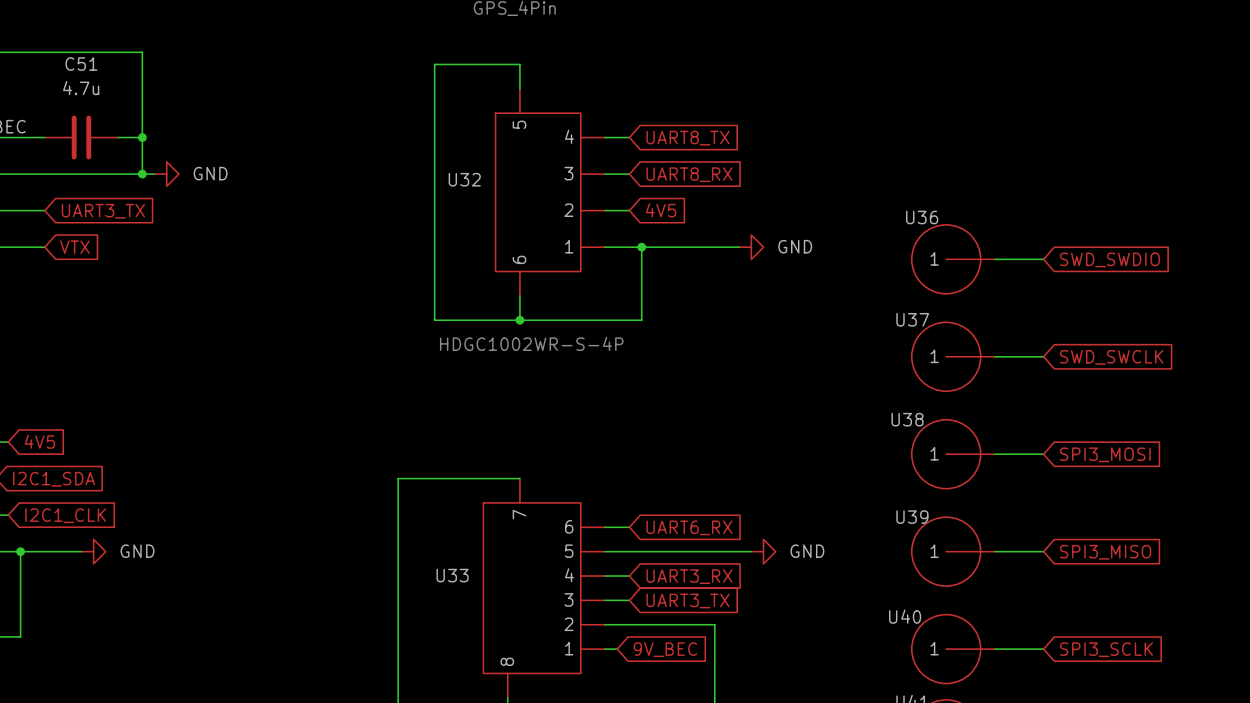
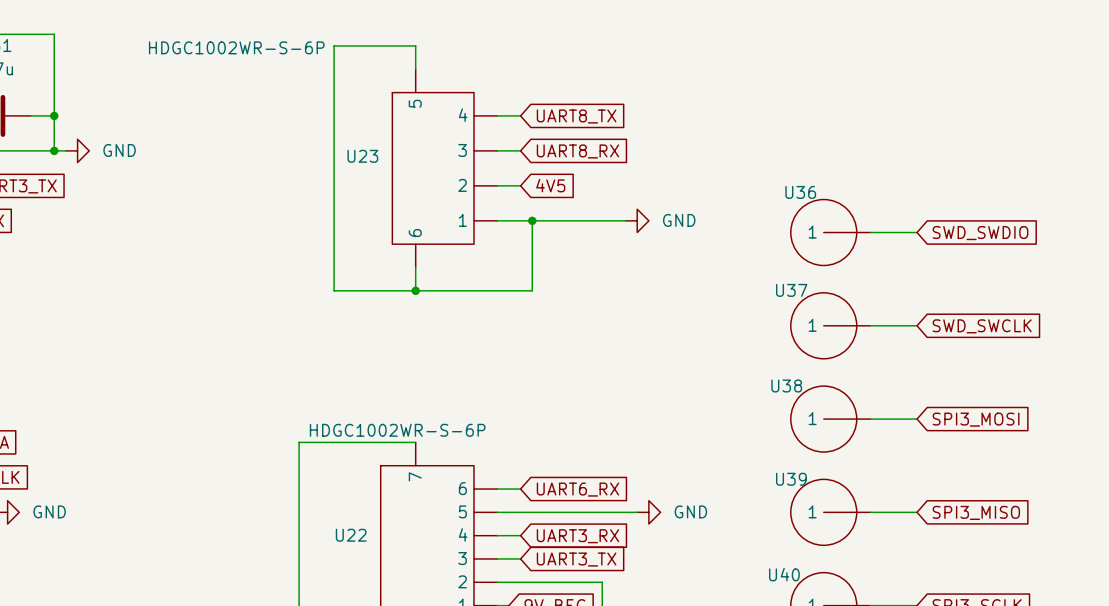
U32 value: none -> HDGC1002WR-S-6P (236, 47)
U32 name: U32 (464, 179) -> U23 (362, 156)
text: HDGC1002WR-S-4P (531, 343) -> none
U33 value: none -> HDGC1002WR-S-6P (397, 430)
U33 name: U33 (452, 575) -> U22 (351, 535)

